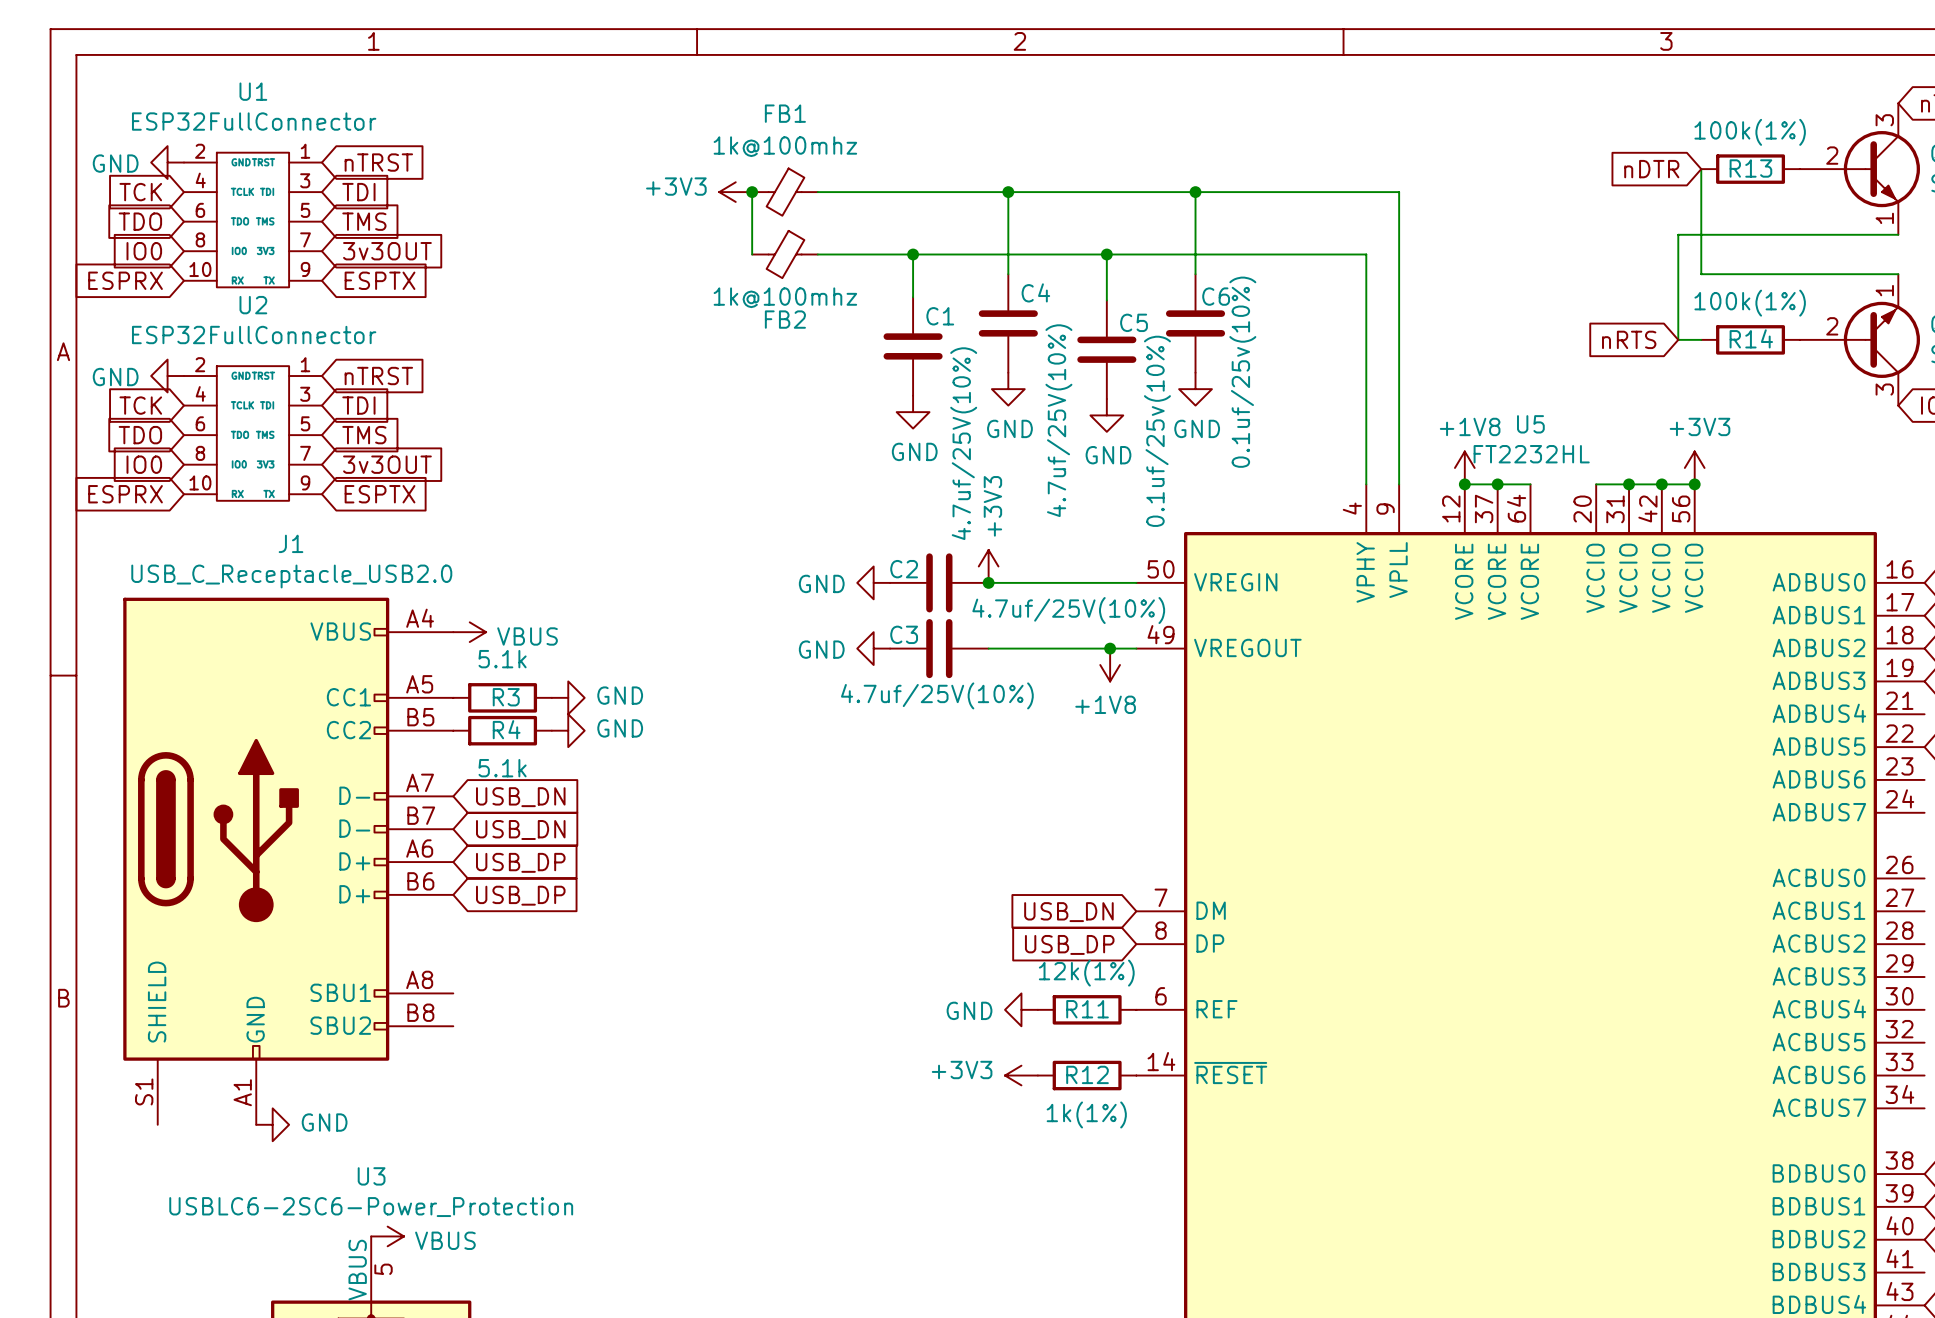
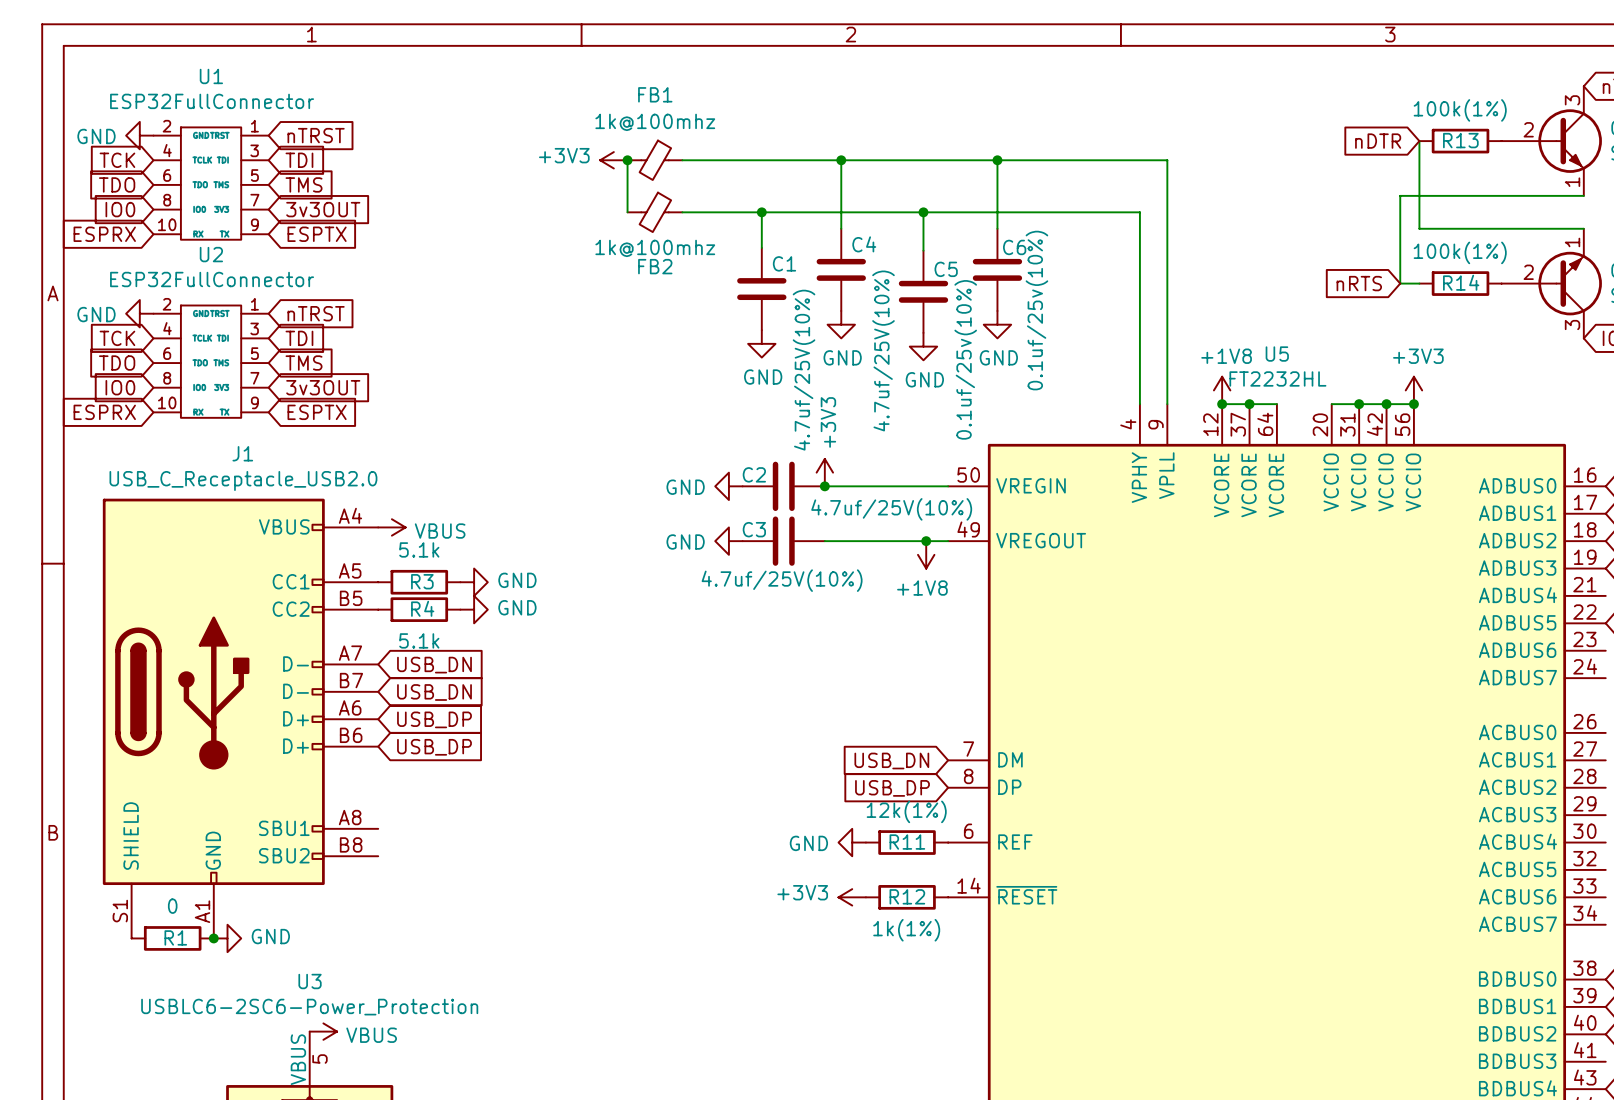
R1: none -> 0 (172, 938)
junction: none -> (213, 938)

